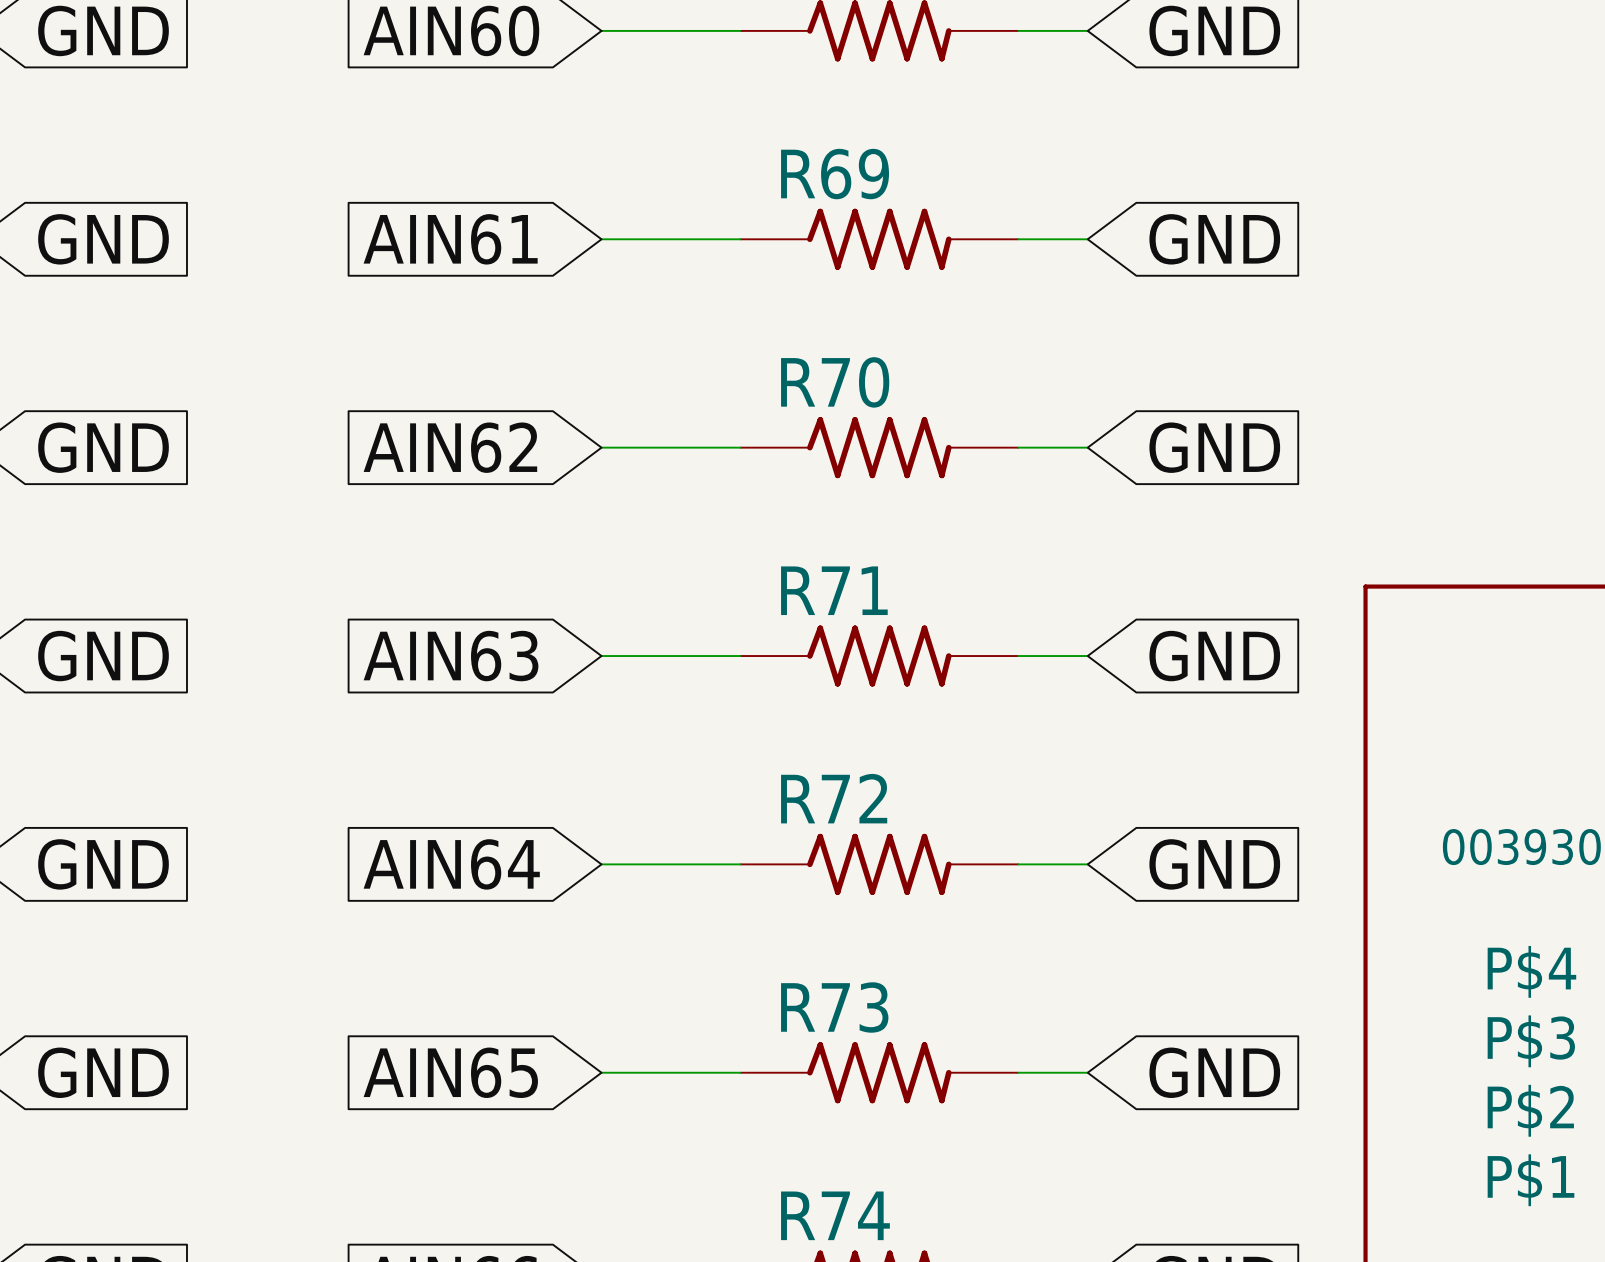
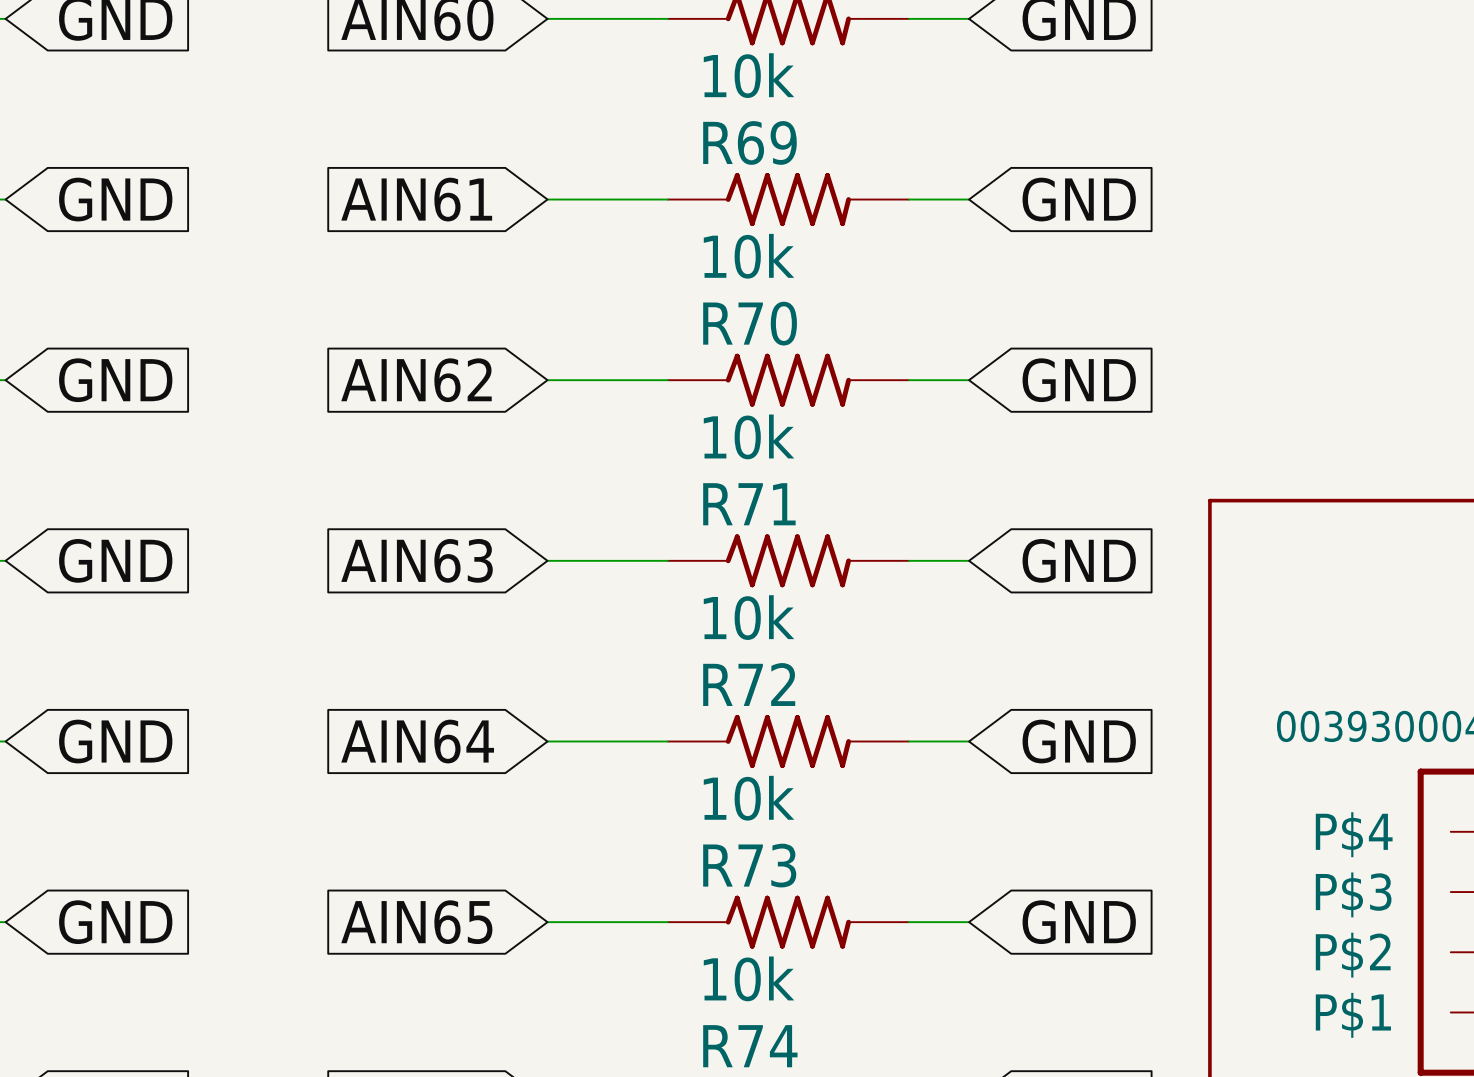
part value: none -> 10k (749, 75)
R69 value: none -> 10k (749, 256)
R70 value: none -> 10k (749, 436)
R71 value: none -> 10k (749, 617)
R72 value: none -> 10k (749, 798)
R73 value: none -> 10k (749, 978)

